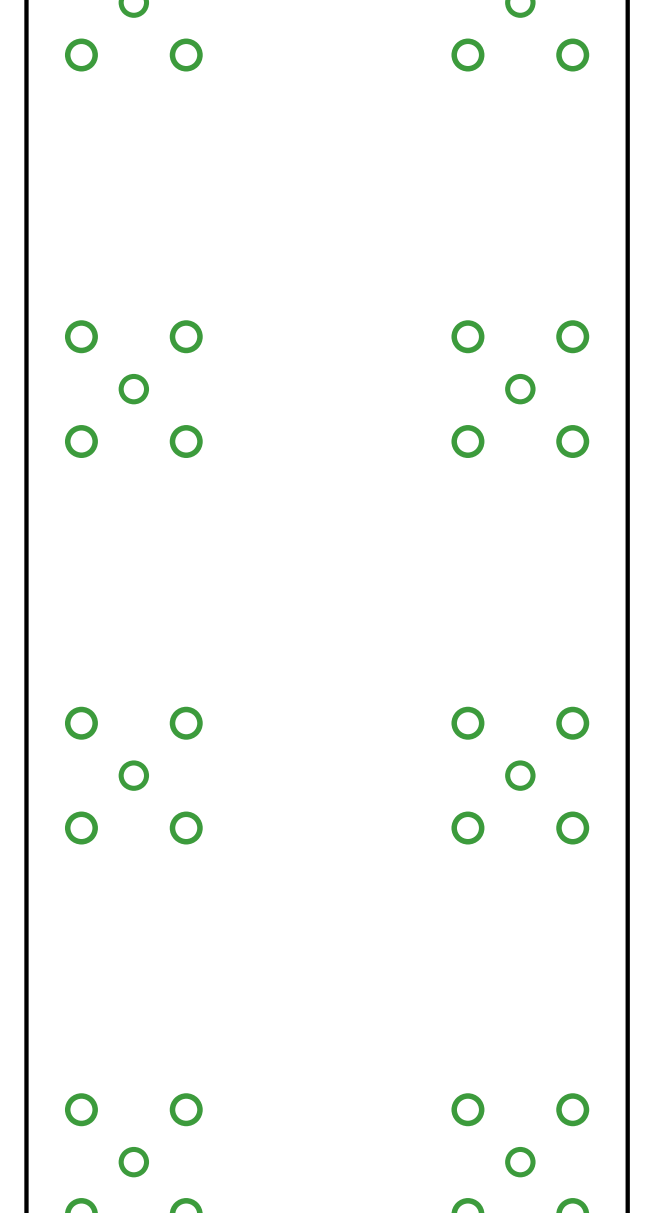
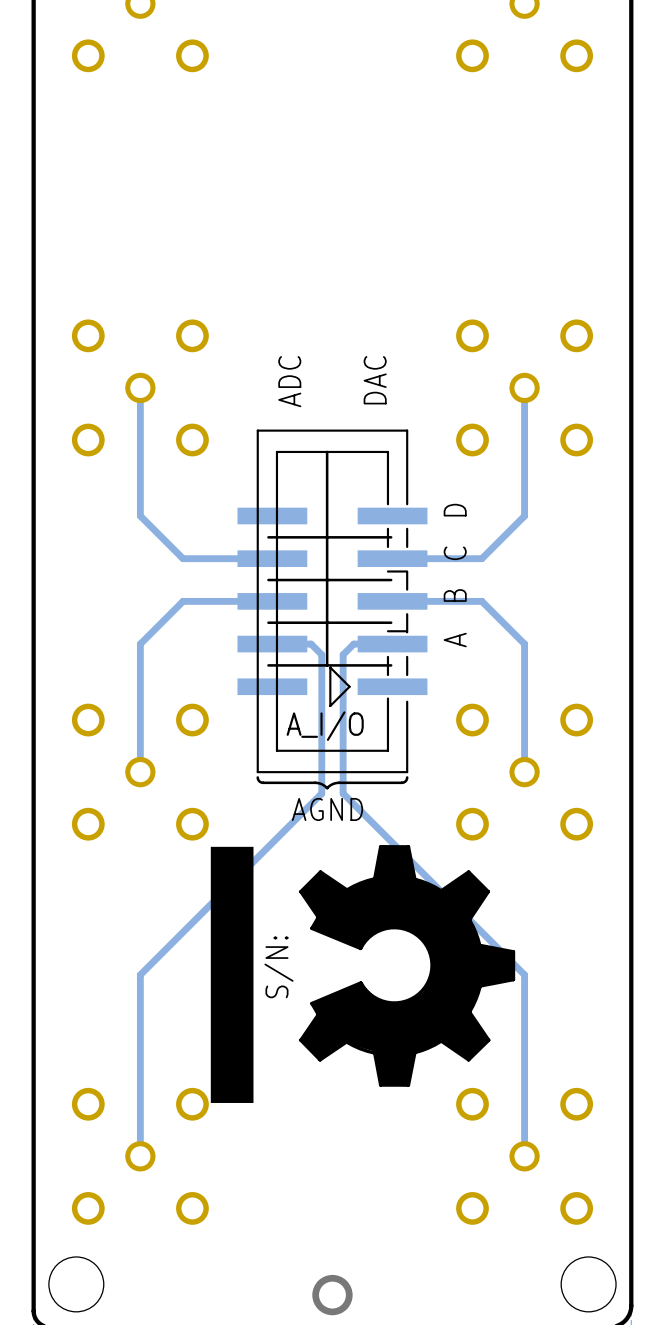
text: none -> DAC (375, 380)
text: none -> ADC (289, 381)
track: none -> (140, 387) (140, 516) (183, 558) (272, 558)
track: none -> (524, 387) (524, 516) (481, 558) (392, 558)
line: none -> (327, 451) (327, 665)
text: none -> D (455, 510)
line: none -> (391, 537) (268, 537)
text: none -> C (455, 553)
line: none -> (391, 580) (268, 580)
text: none -> B (455, 595)
track: none -> (272, 601) (183, 601) (140, 644) (140, 772)
A_I/O: none -> (332, 601)
track: none -> (392, 601) (481, 601) (524, 644) (524, 772)
line: none -> (391, 622) (268, 622)
text: none -> A (455, 640)
track: none -> (272, 644) (311, 644) (321, 654) (321, 793) (140, 974) (140, 1156)
track: none -> (392, 644) (353, 644) (343, 654) (343, 793) (524, 974) (524, 1156)
line: none -> (391, 665) (268, 665)
line: none -> (407, 777) (402, 782) (337, 782) (327, 788) (317, 782) (262, 782) (257, 777)
text: none -> AGND (327, 809)
drawing: none -> [299, 845, 516, 1087]
drawing: none -> [210, 846, 254, 1103]
text: none -> S/N: (279, 967)

